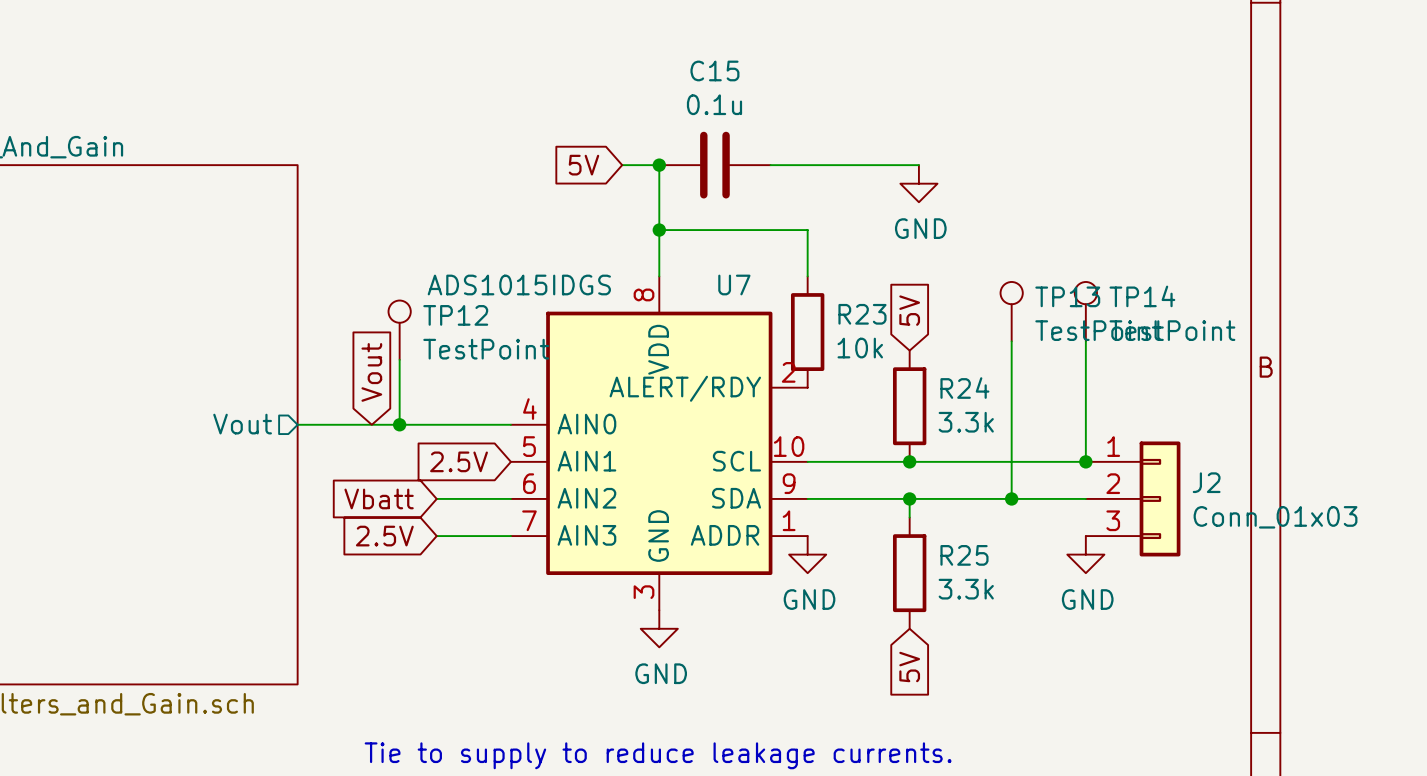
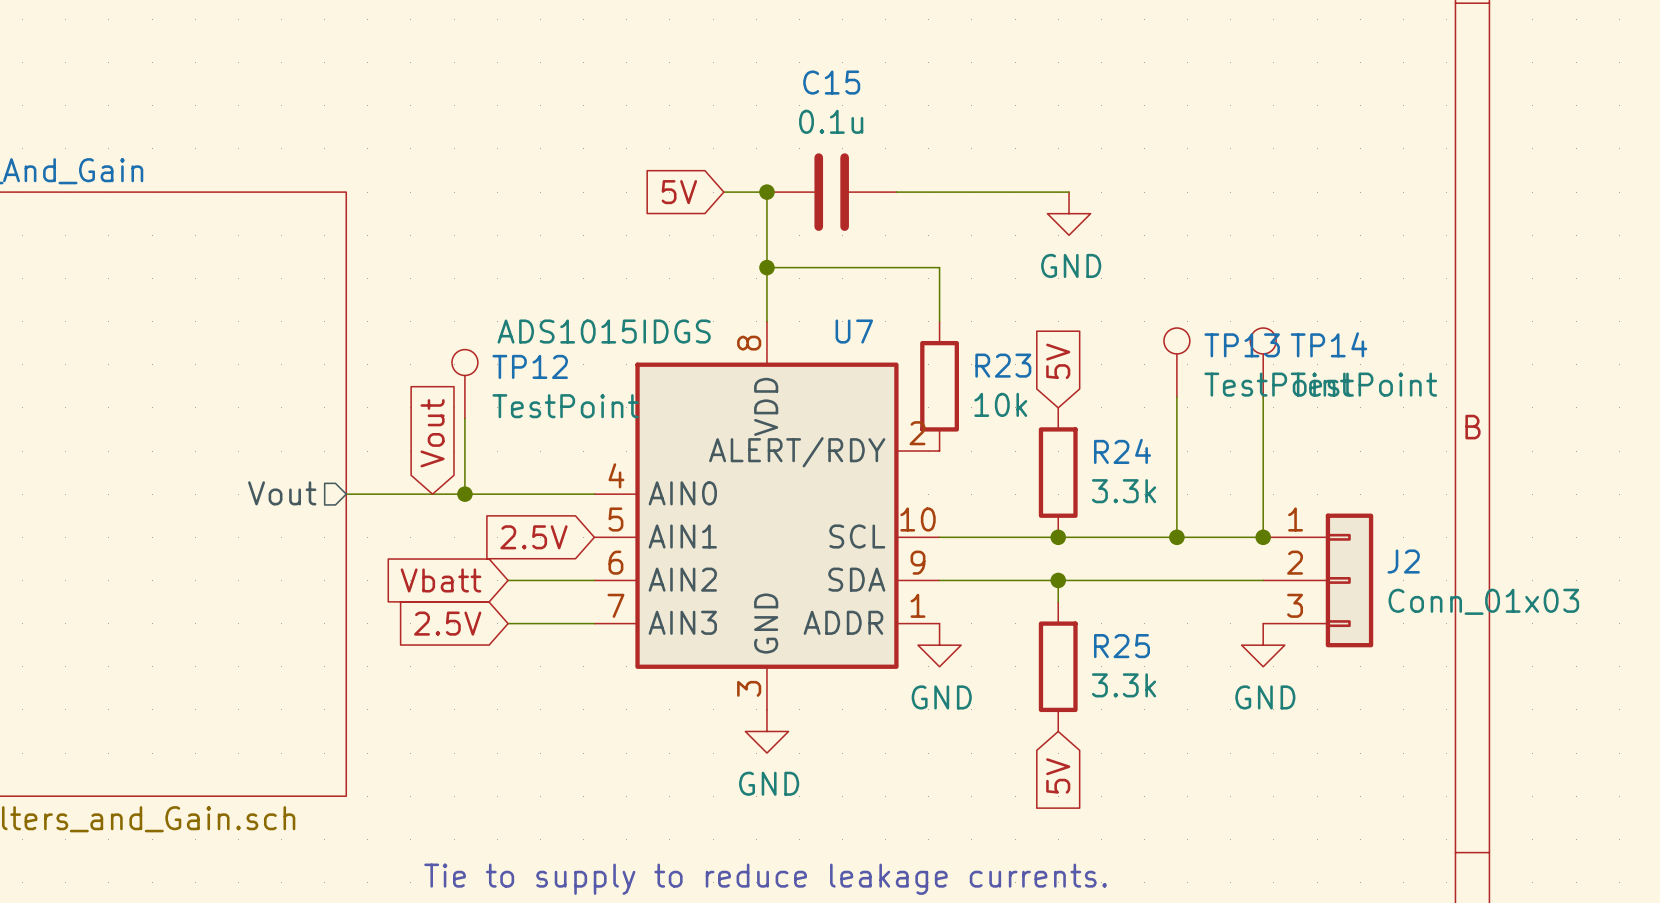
wire: (1011, 461) (1011, 498) -> none
junction position: (1011, 498) -> (1176, 537)

